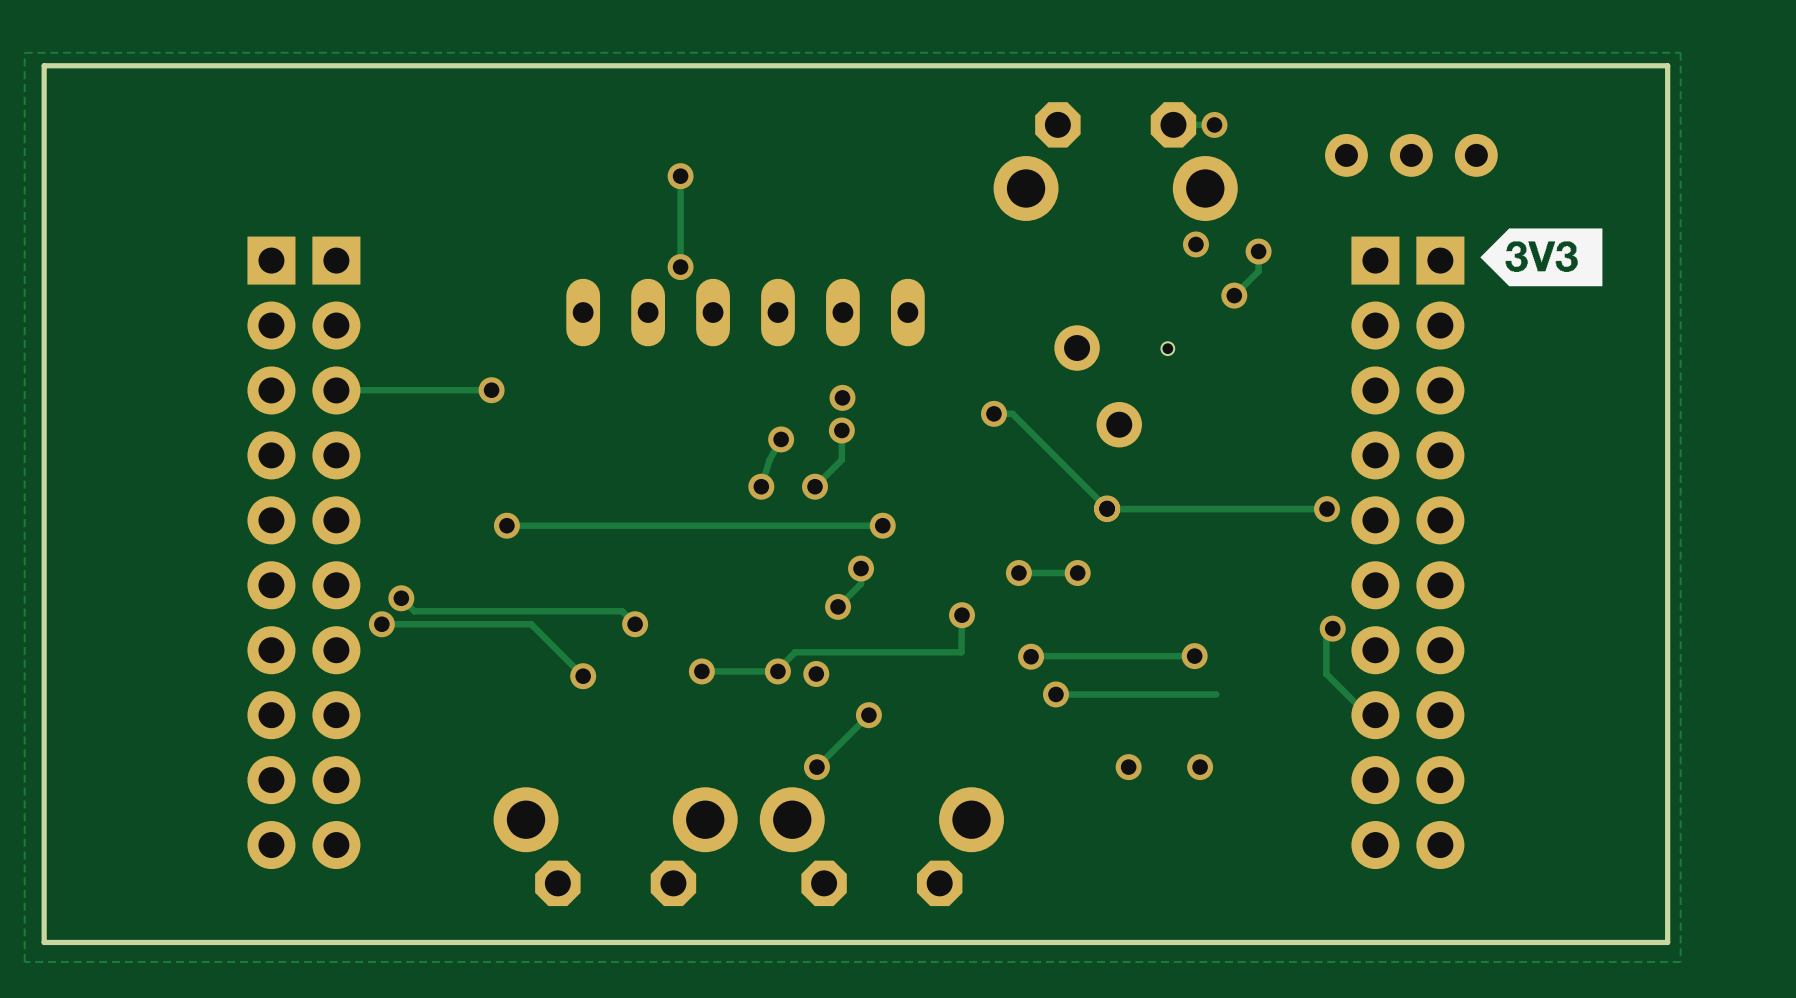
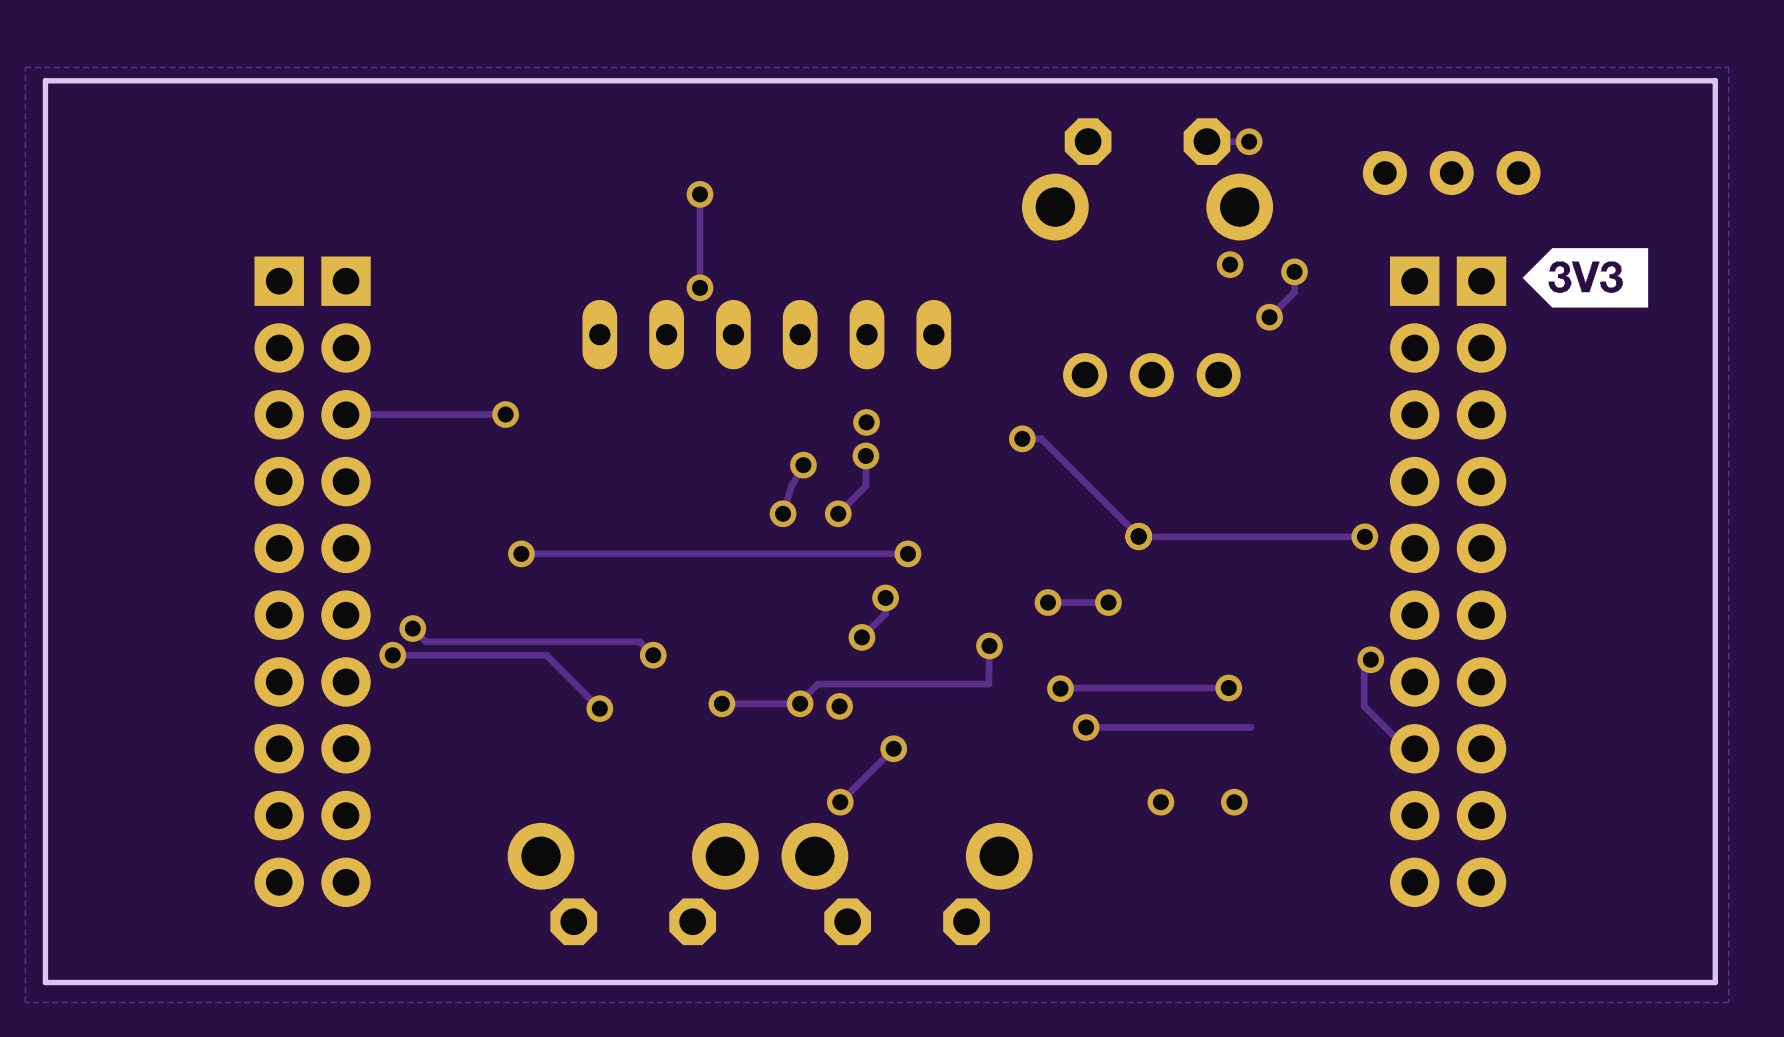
part: (1077, 348) -> none
hole: (1167, 348) -> none
part: none -> (1151, 375)
part: (1119, 424) -> none

